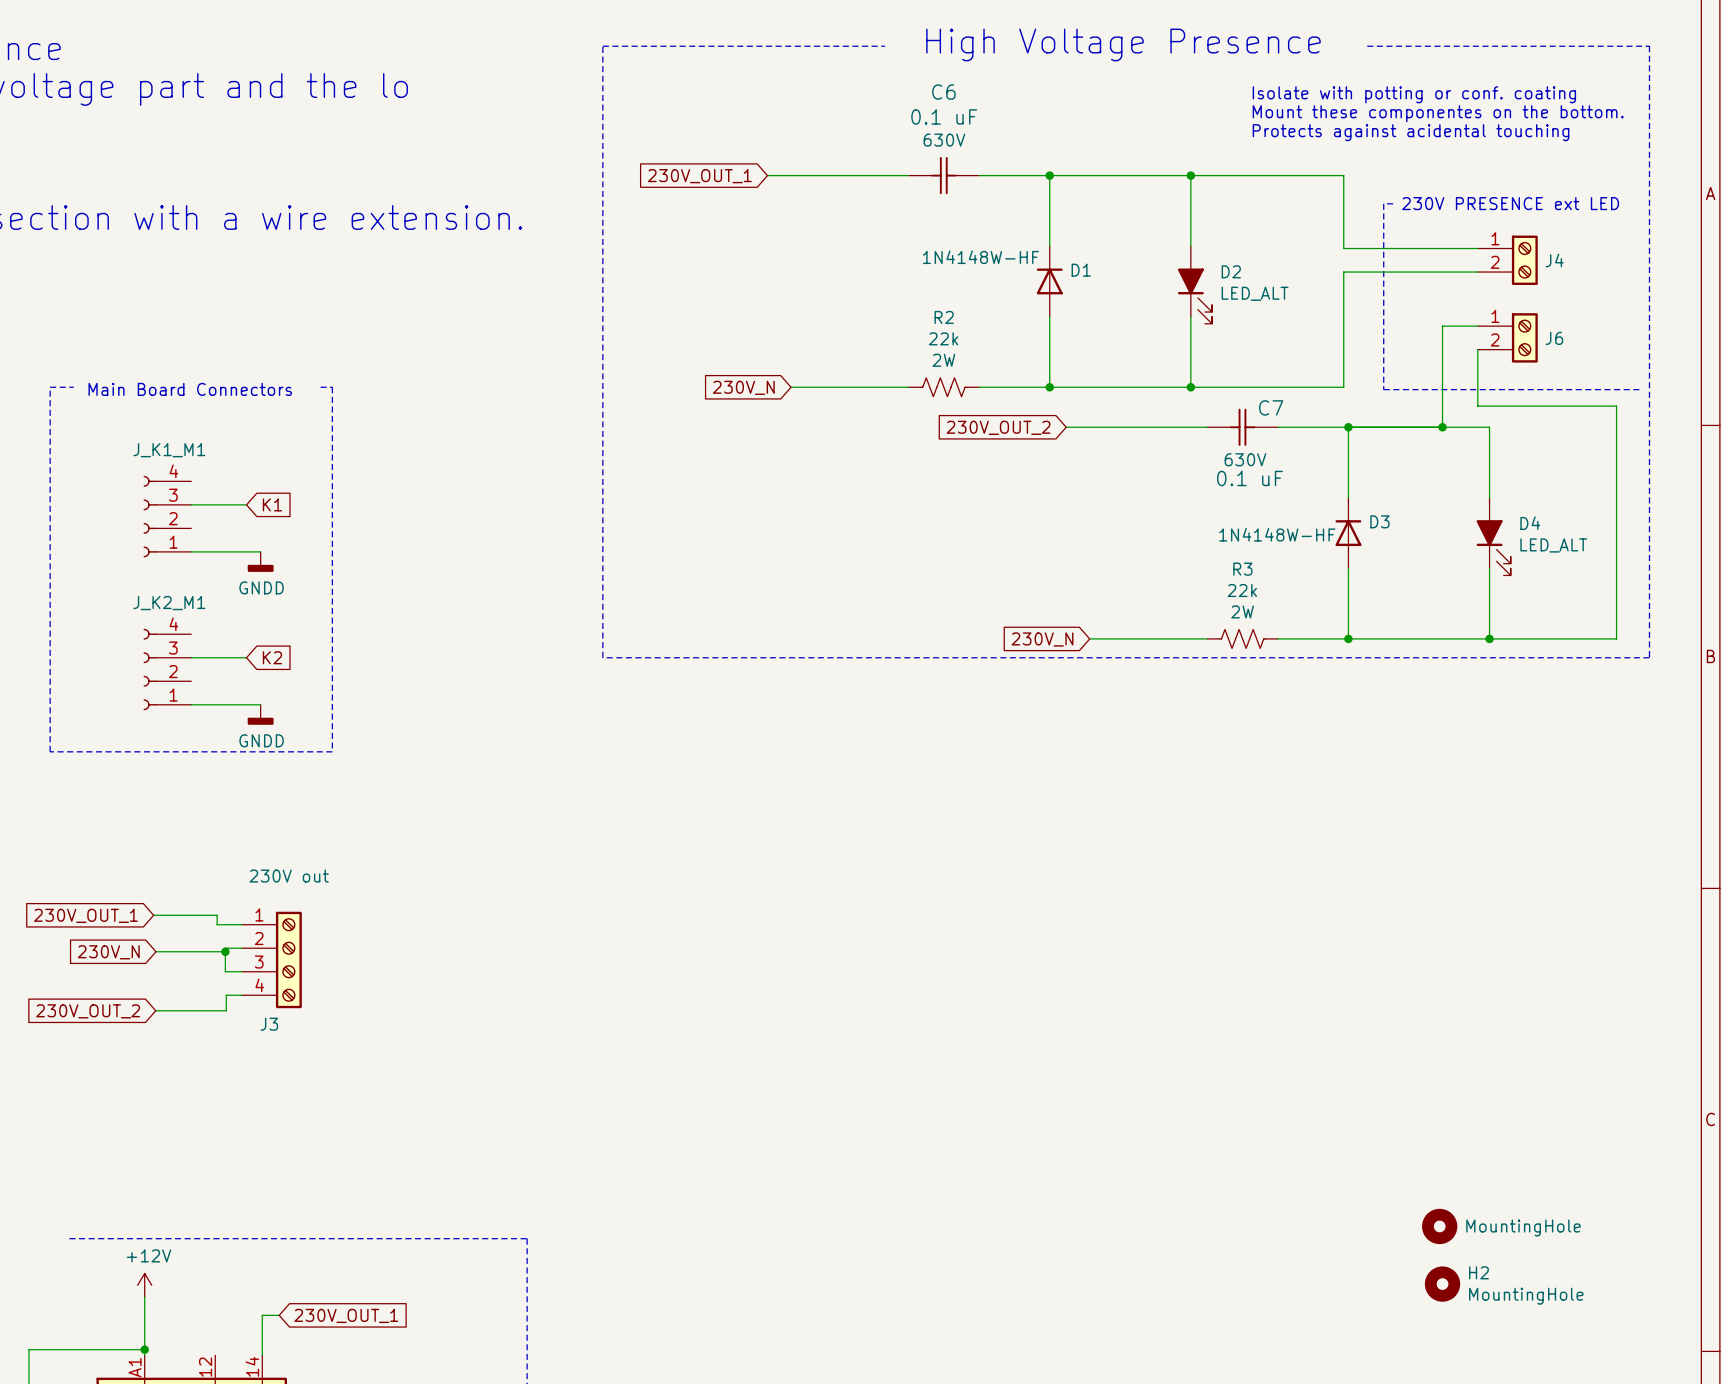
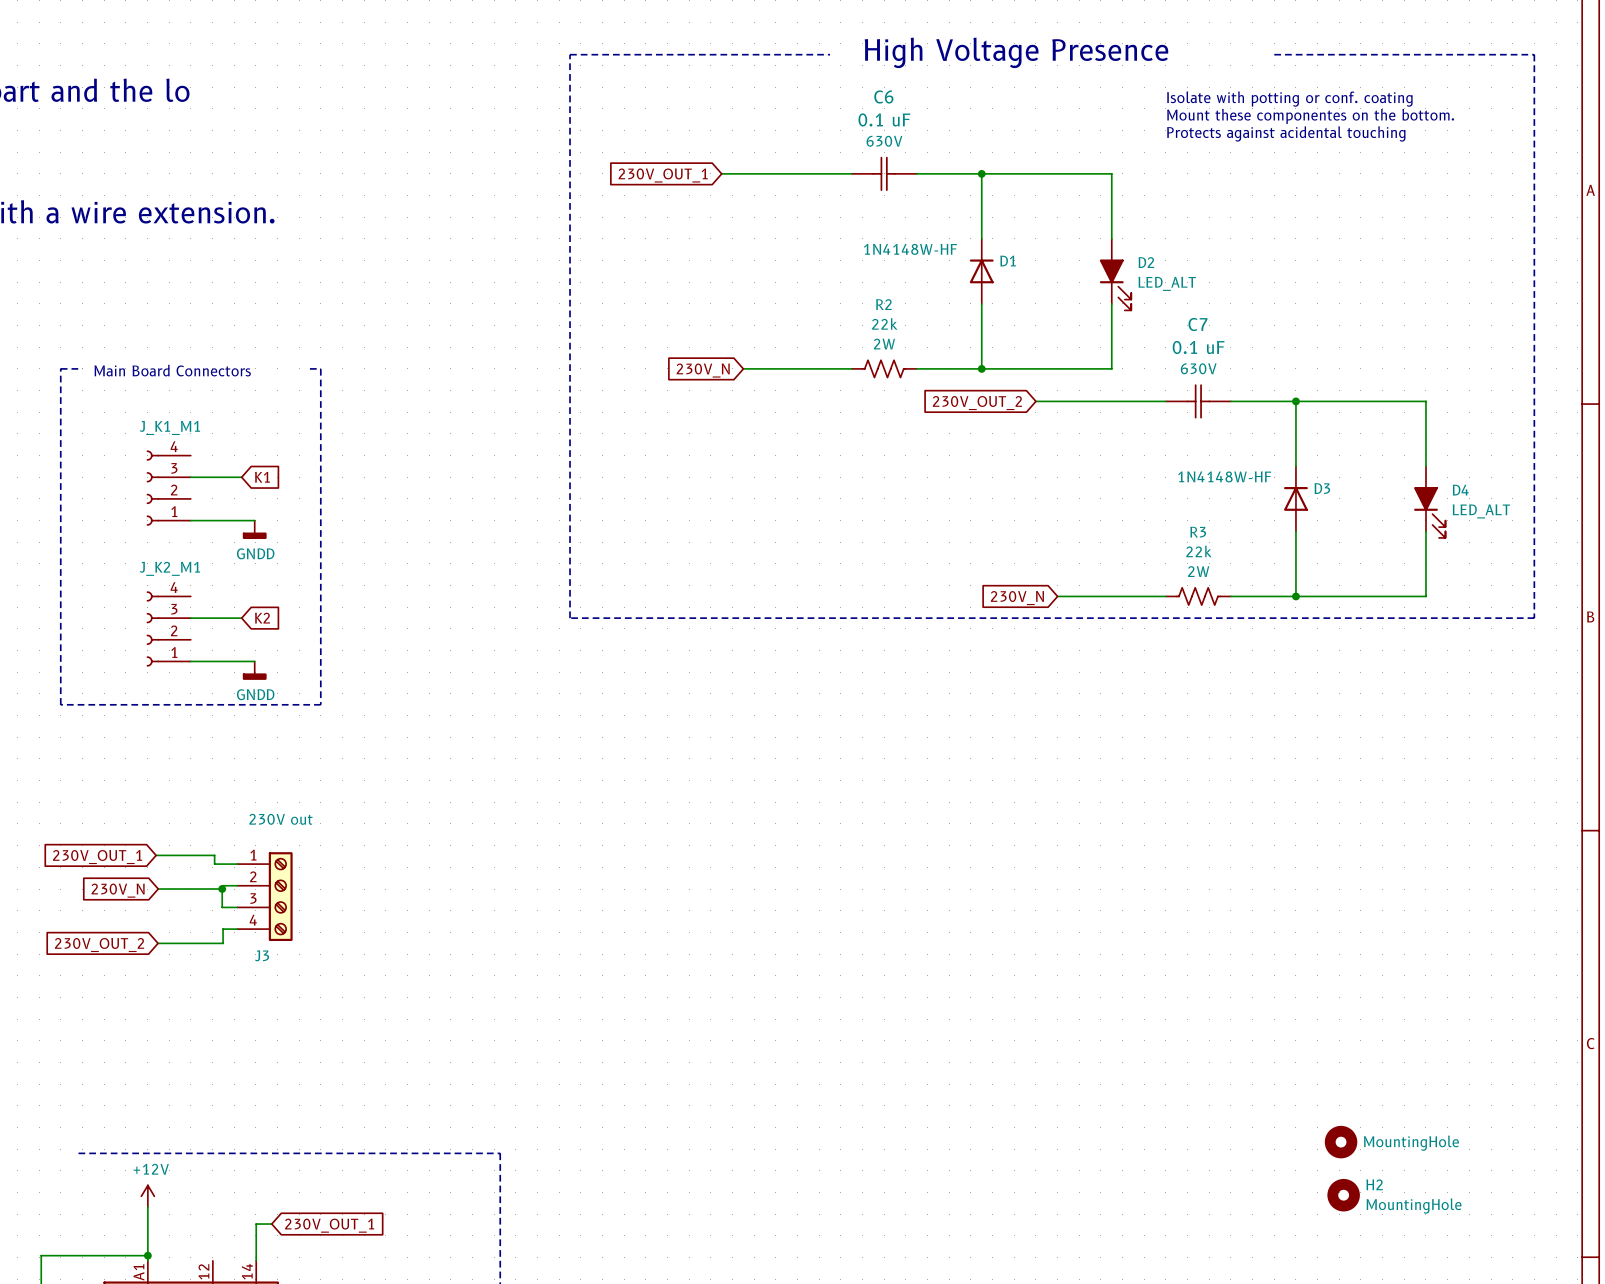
wire: (1190, 175) (1343, 175) (1343, 248) (1477, 248) -> none
junction: (1190, 175) -> none
line: (1393, 203) (1383, 203) (1383, 389) (1640, 389) -> none
text: 230V PRESENCE ext LED (1510, 203) -> none
J4: (1507, 260) -> none
wire: (1477, 272) (1343, 272) (1343, 387) (1190, 387) -> none
wire: (1477, 326) (1442, 326) (1442, 427) -> none
J6: (1507, 337) -> none
wire: (1477, 349) (1477, 406) (1616, 406) (1616, 638) (1277, 638) -> none
junction: (1190, 387) -> none
C7 name position: C7 (1271, 407) -> C7 (1197, 324)
junction: none -> (1295, 401)
global label position: 230V_OUT_2 (998, 427) -> 230V_OUT_2 (977, 403)
wire: (1066, 427) (1207, 427) -> (1035, 401) (1165, 401)
C7 position: (1242, 427) -> (1198, 401)
wire: (1277, 427) (1489, 427) (1489, 497) -> (1230, 401) (1425, 401) (1425, 466)
wire: (1348, 427) (1348, 497) -> (1295, 401) (1295, 466)
junction: (1348, 427) -> none
junction: (1442, 427) -> none
C7 text position: 630V (1245, 459) -> 630V (1198, 368)
C7 value position: 0.1 uF (1249, 478) -> 0.1 uF (1198, 347)
D3 position: (1348, 533) -> (1295, 498)
D3 value position: 1N4148W-HF (1277, 534) -> 1N4148W-HF (1224, 476)
D4 position: (1493, 536) -> (1429, 502)
wire: none -> (1425, 531) (1425, 596) (1230, 596)
wire: (1348, 568) (1348, 638) -> (1295, 531) (1295, 596)
wire: (1489, 568) (1489, 638) -> none
wire: (1089, 638) (1207, 638) -> (1057, 596) (1165, 596)
R3 position: (1242, 638) -> (1198, 596)
junction position: (1348, 638) -> (1295, 596)
junction: (1489, 638) -> none
global label position: 230V_N (1042, 639) -> 230V_N (1017, 598)

